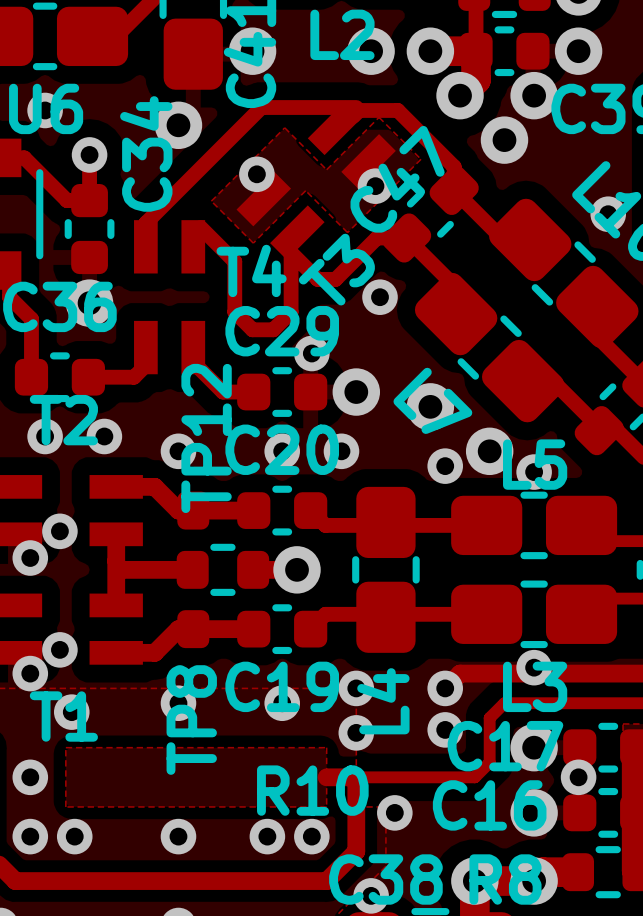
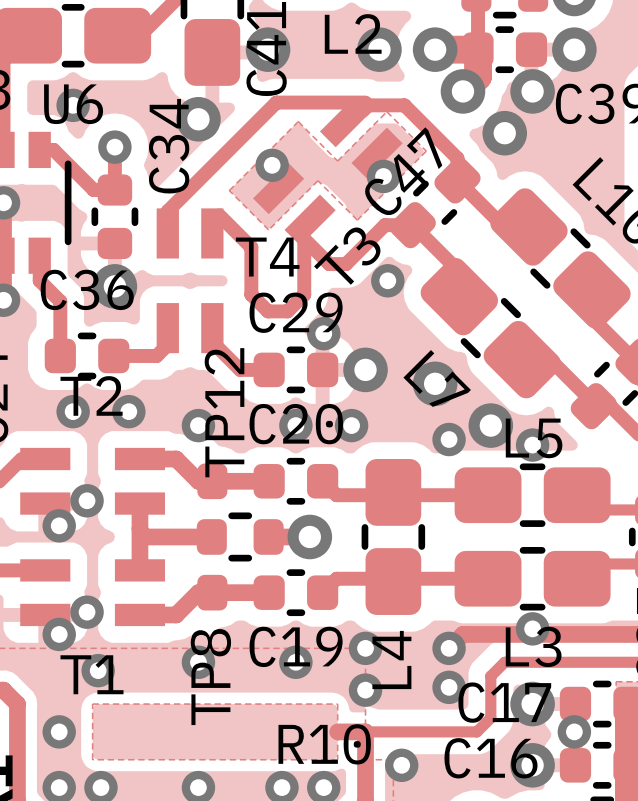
via: (608, 214) -> none

